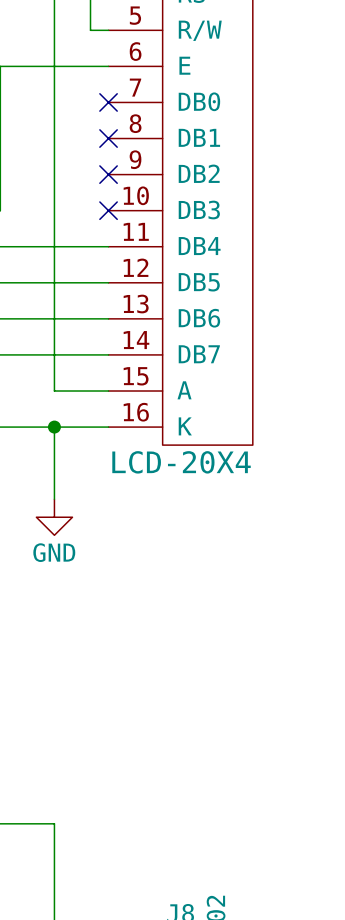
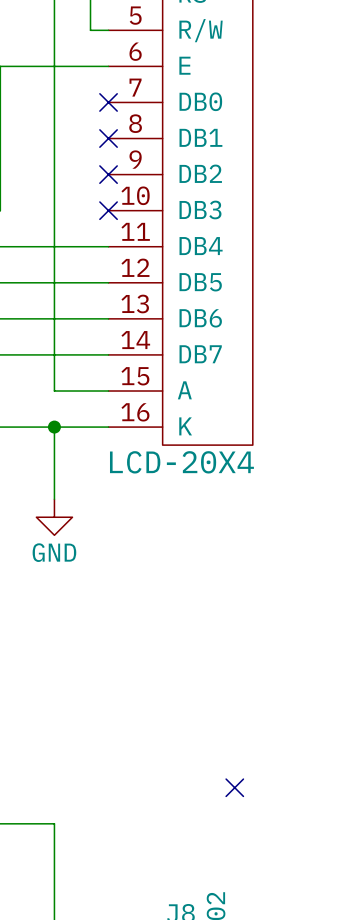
no-connect mark: none -> (234, 787)

